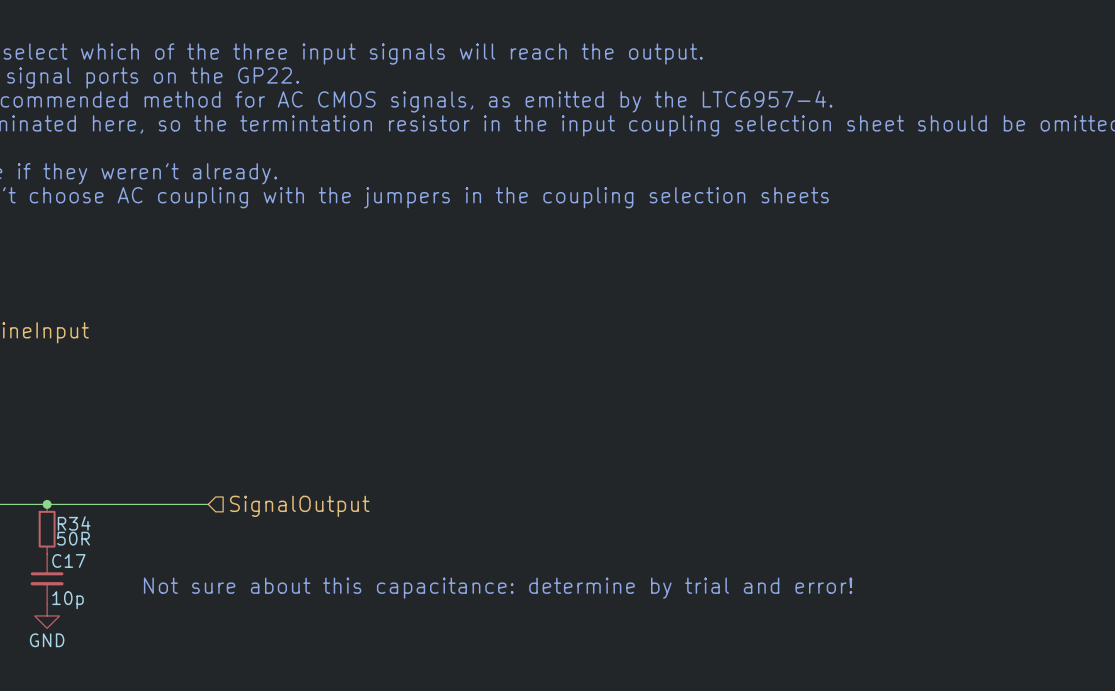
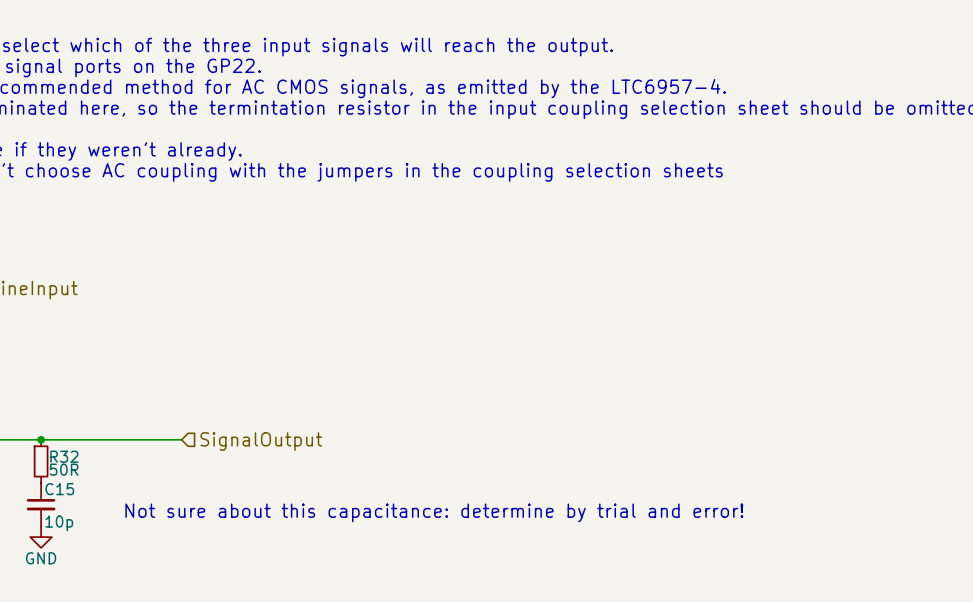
R34 name: R34 (74, 523) -> R32 (64, 456)
C17 name: C17 (68, 560) -> C15 (59, 489)

